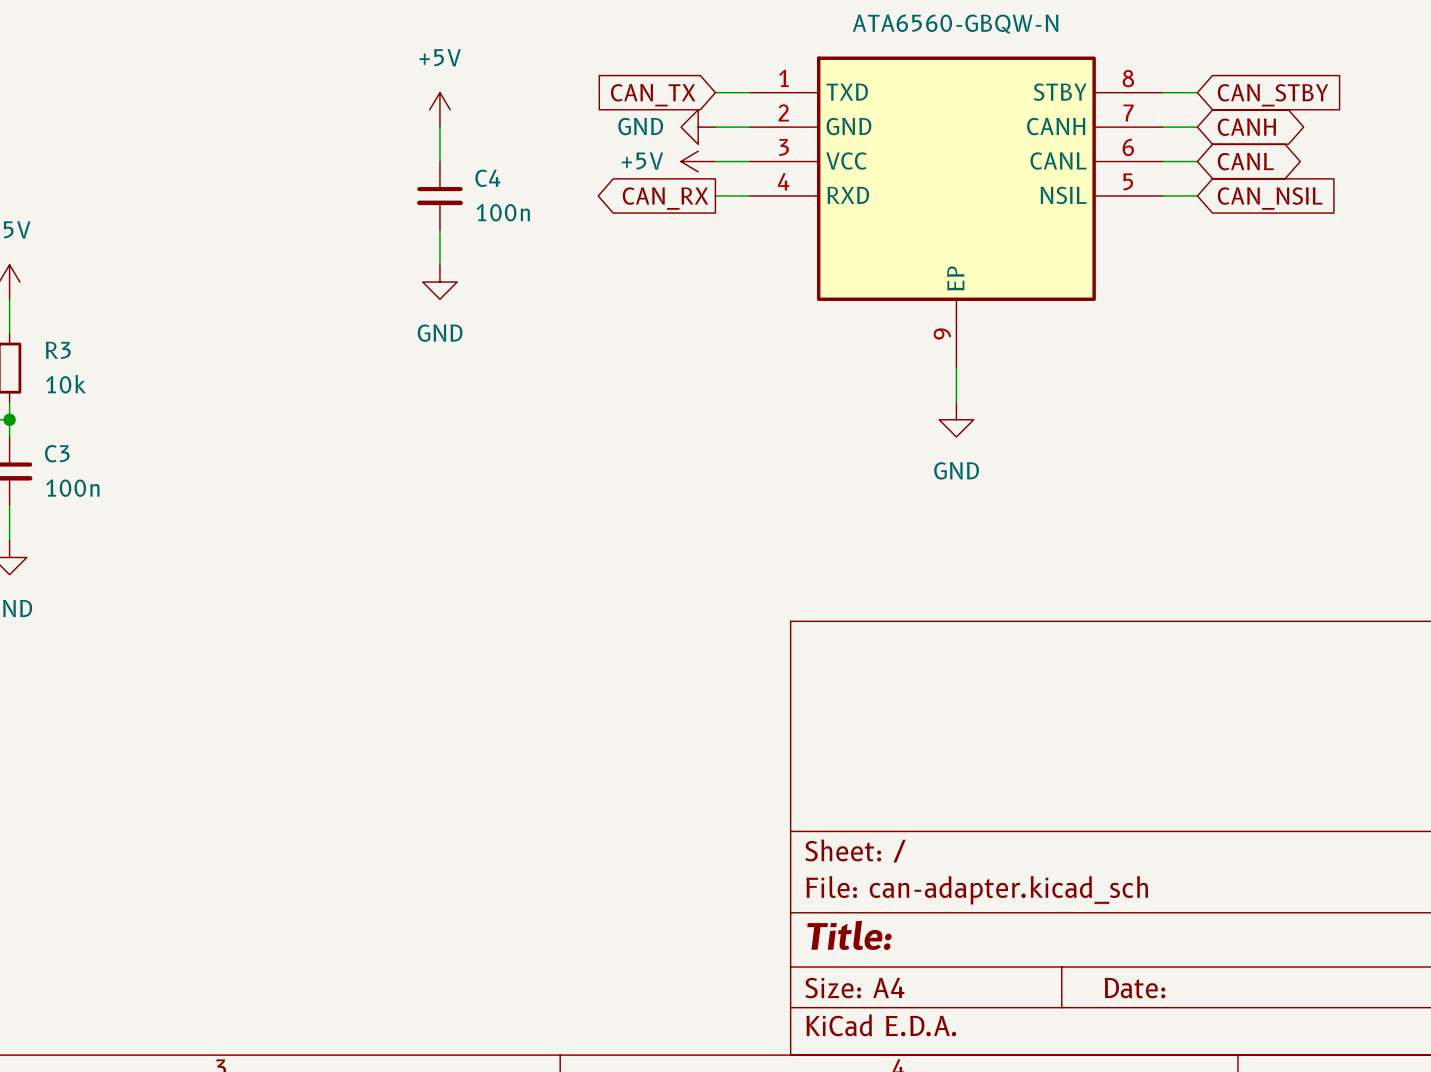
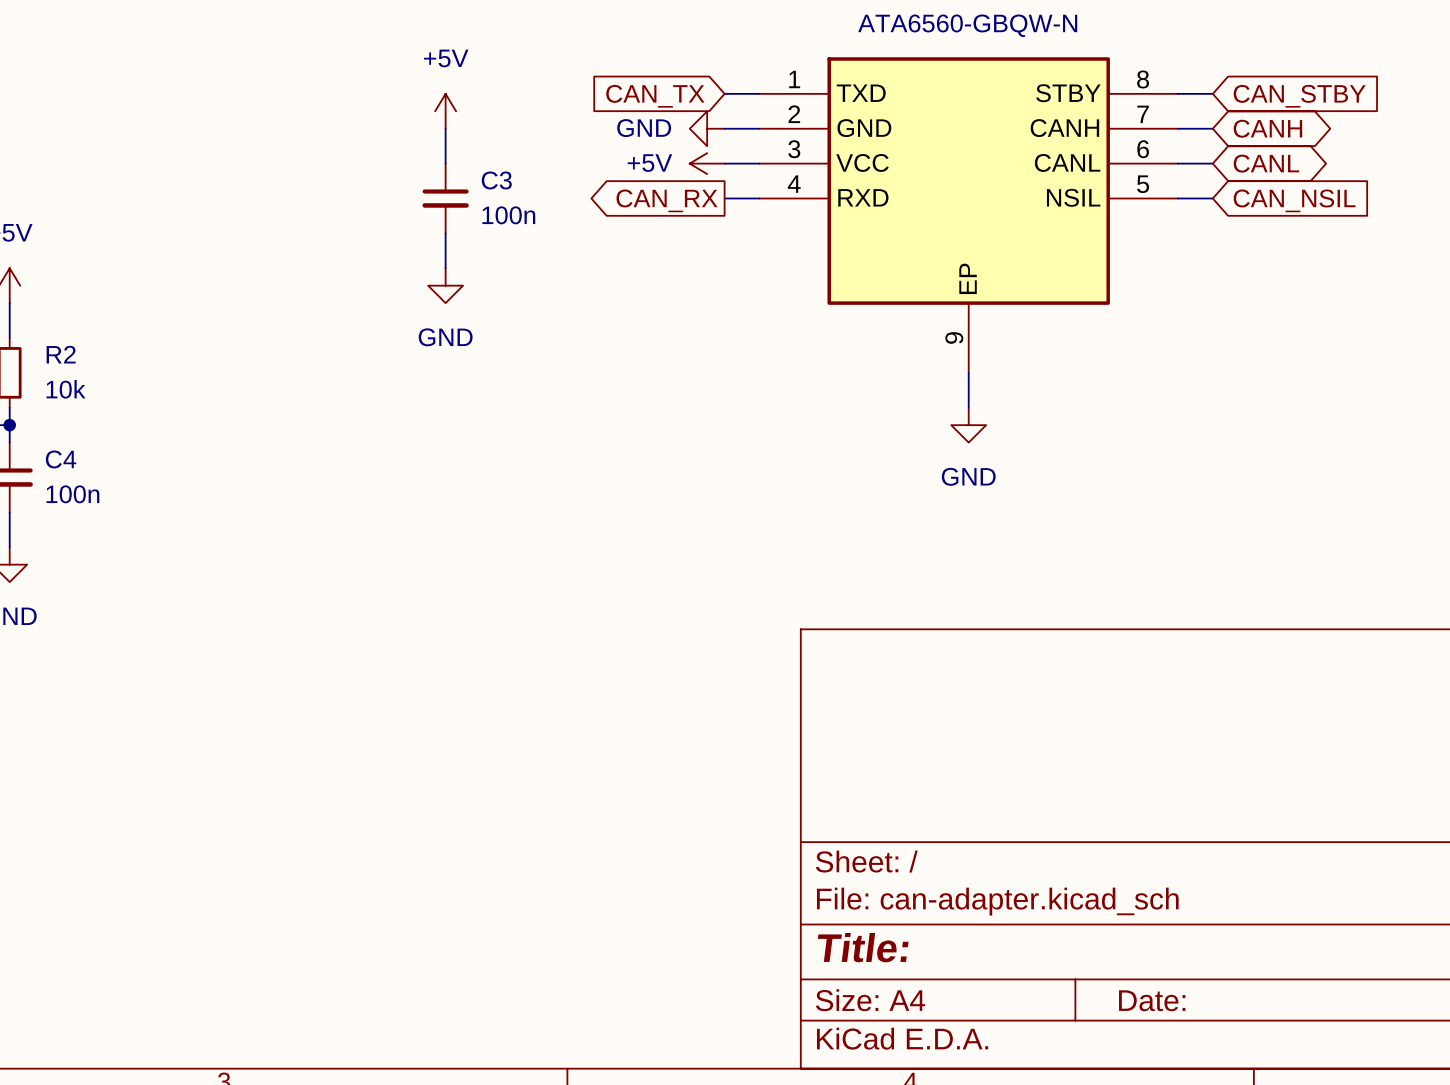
C4 name: C4 (487, 178) -> C3 (496, 180)
R3 name: R3 (58, 350) -> R2 (61, 354)
C3 name: C3 (57, 453) -> C4 (61, 459)

